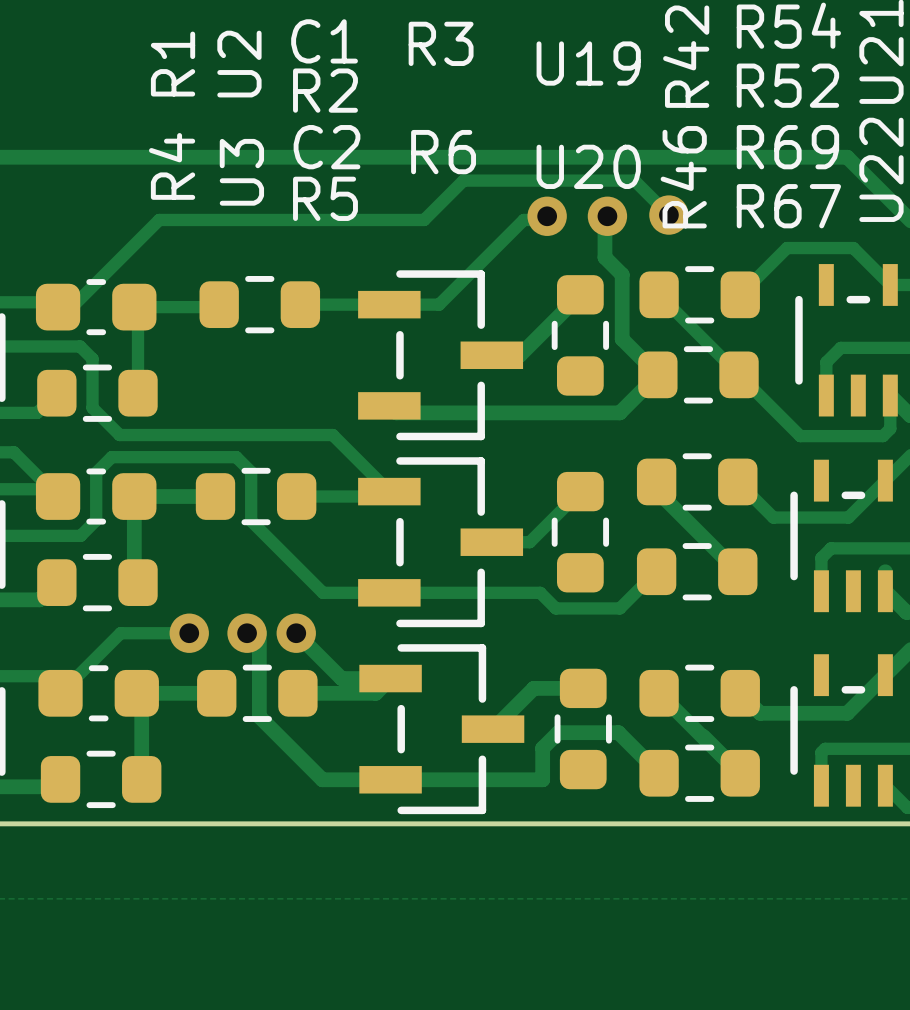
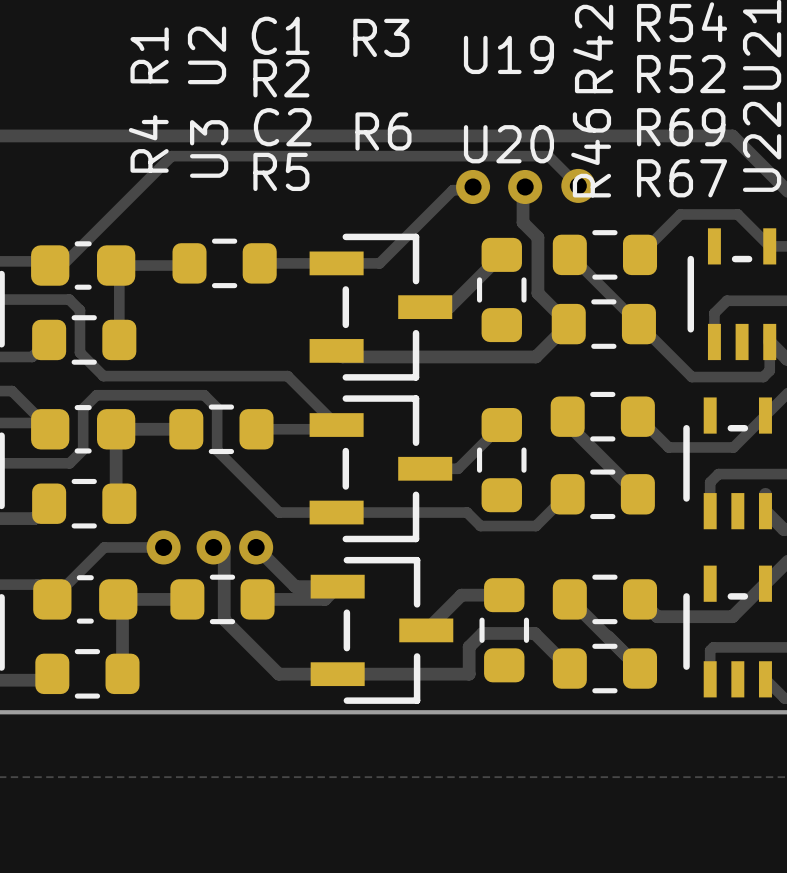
track: (463, 180) (424, 219) (159, 219) -> (400, 156) (171, 156) (137, 190)

